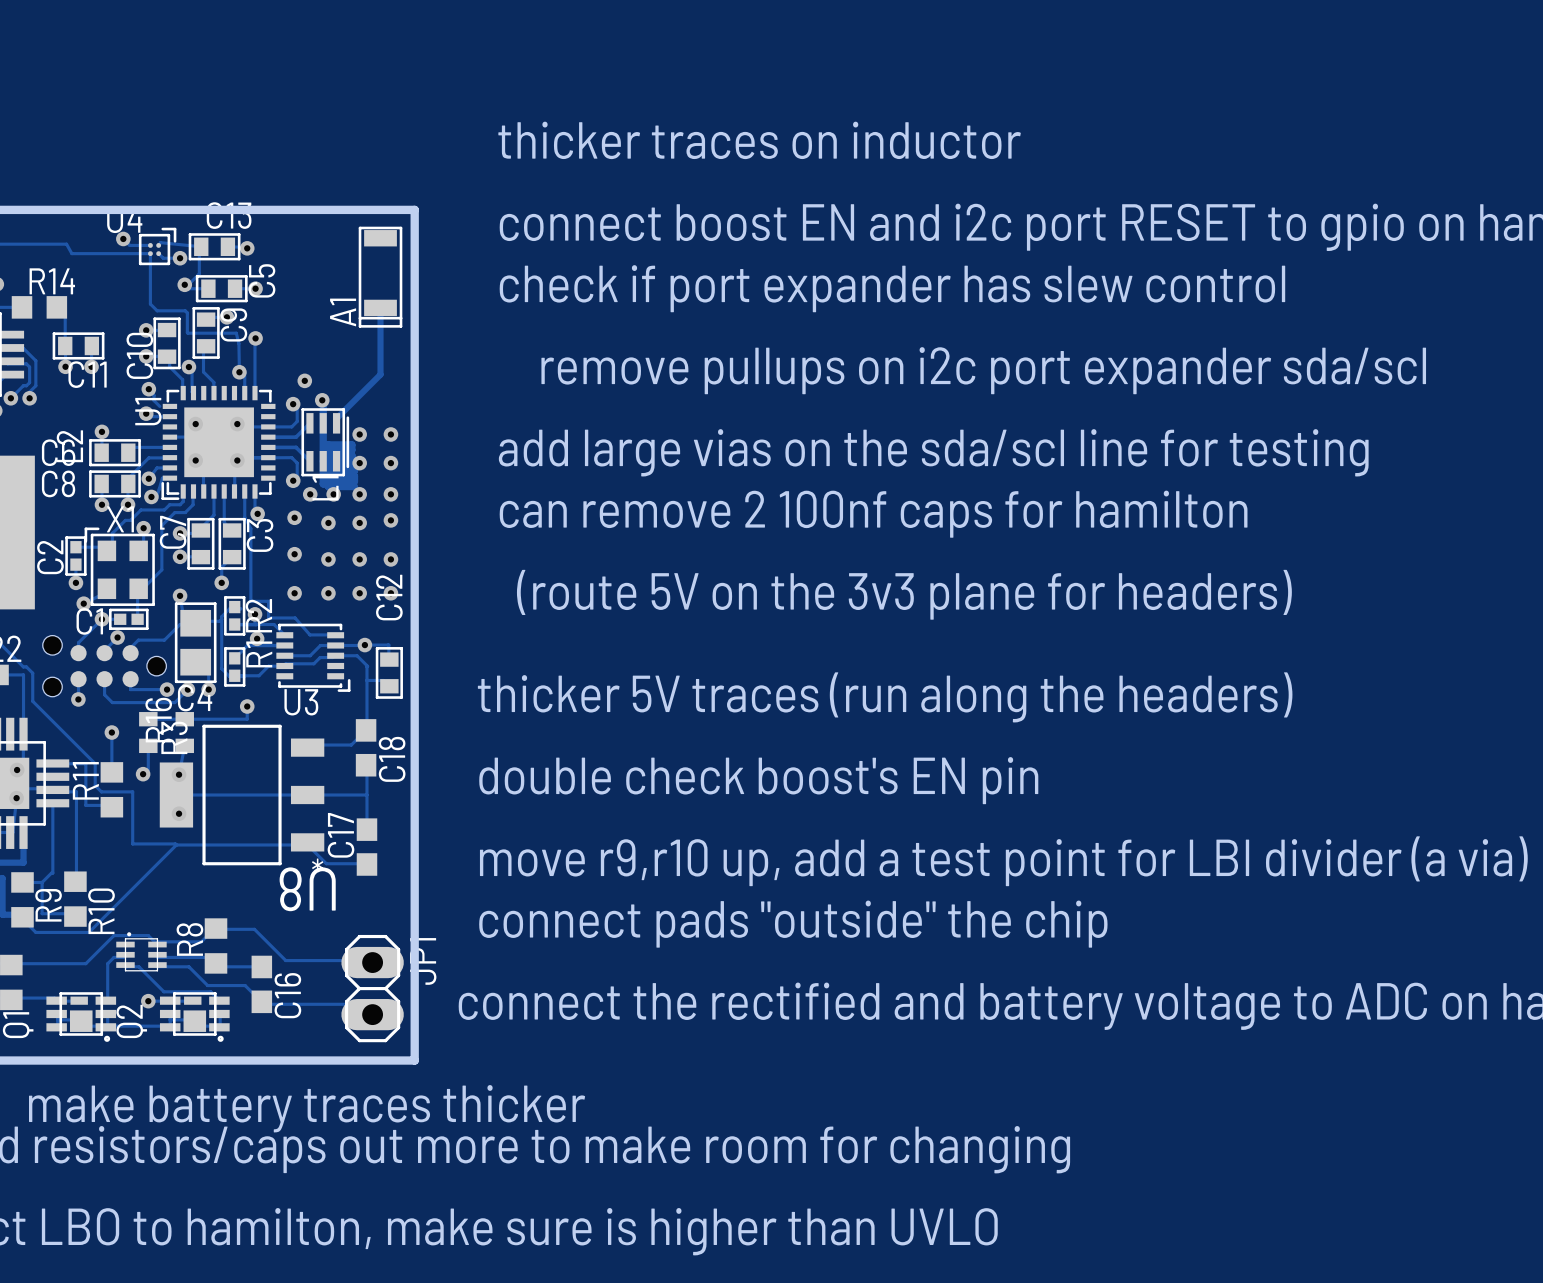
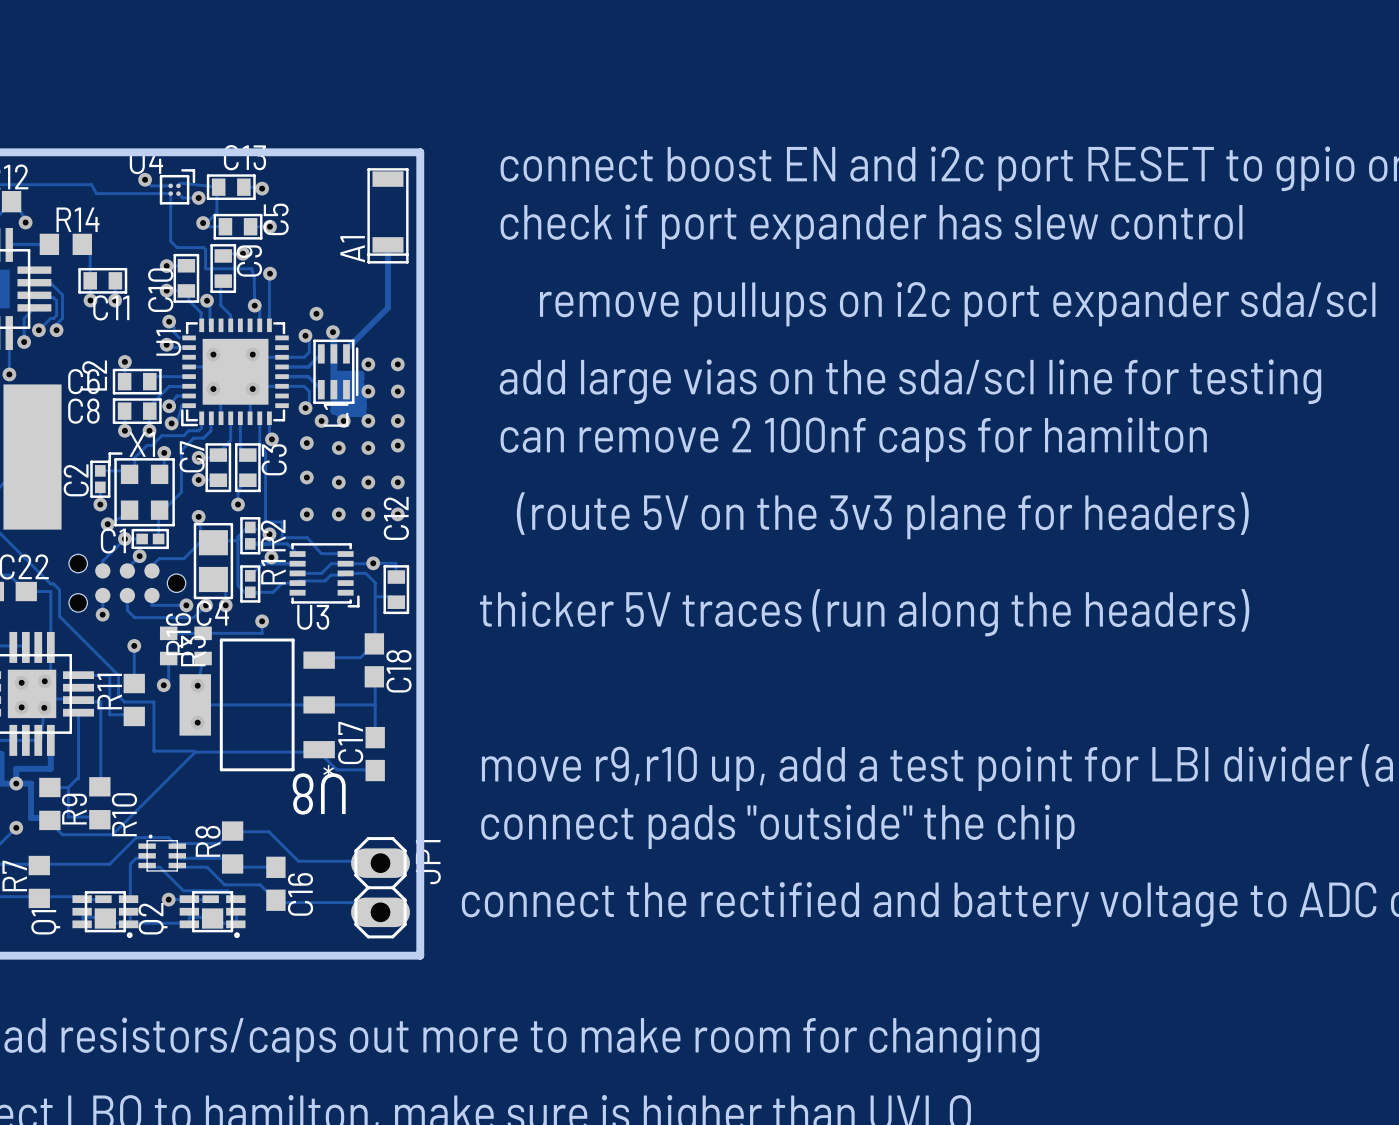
text: thicker traces on inductor (759, 140) -> none
text: double check boost's EN pin (758, 780) -> none
text: make battery traces thicker (307, 1108) -> none

